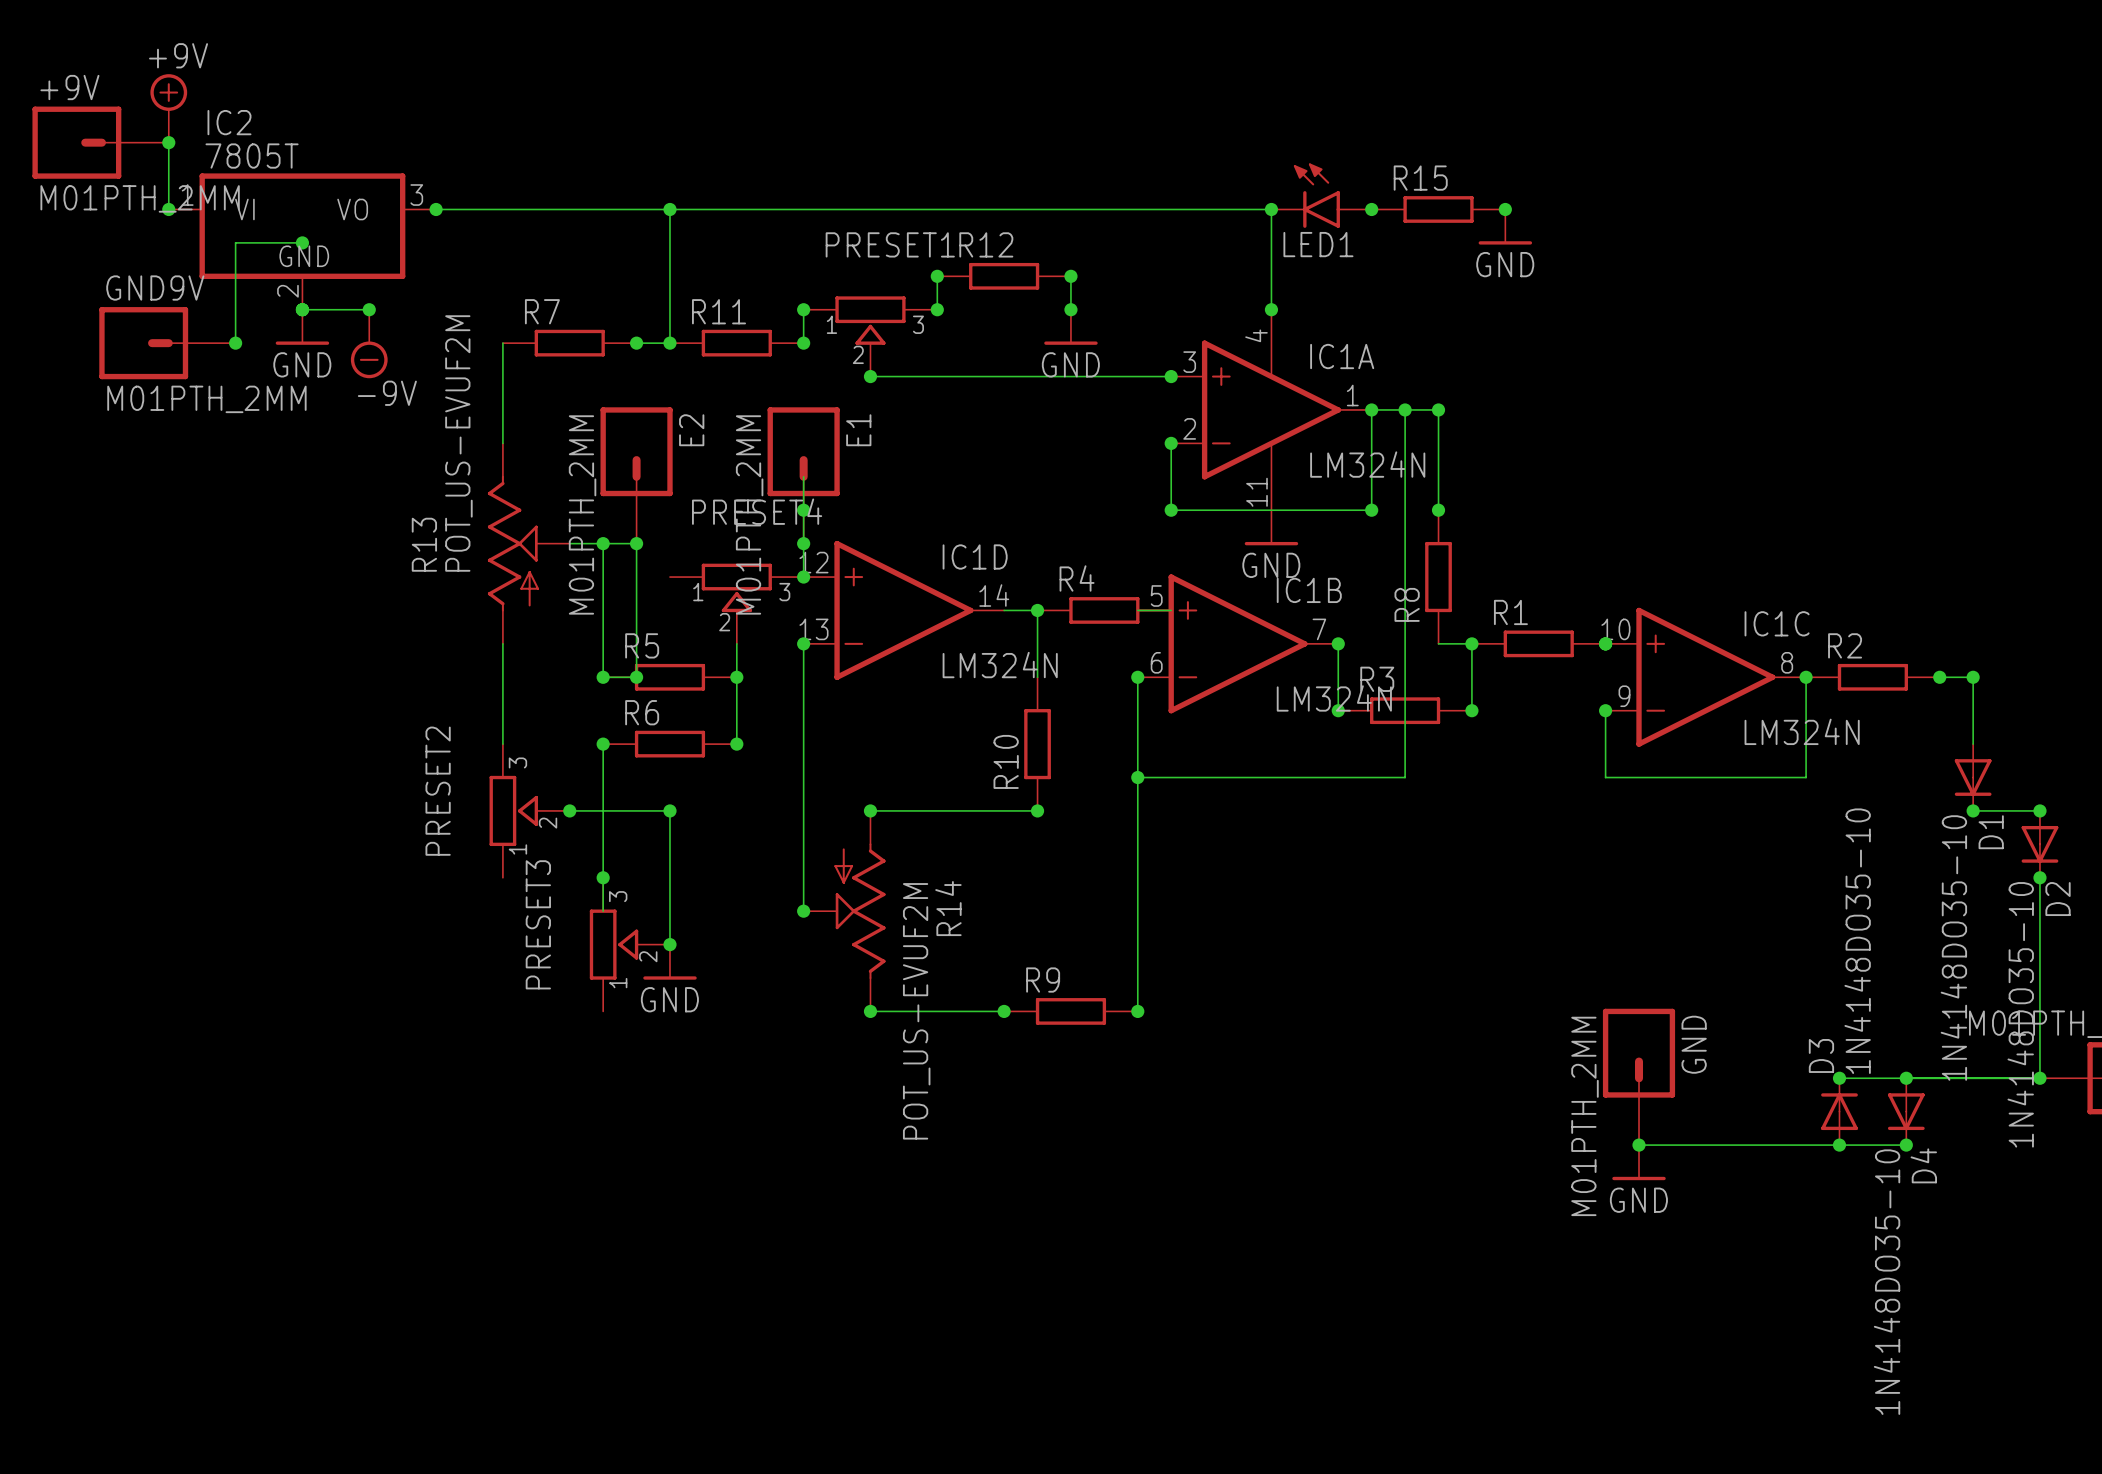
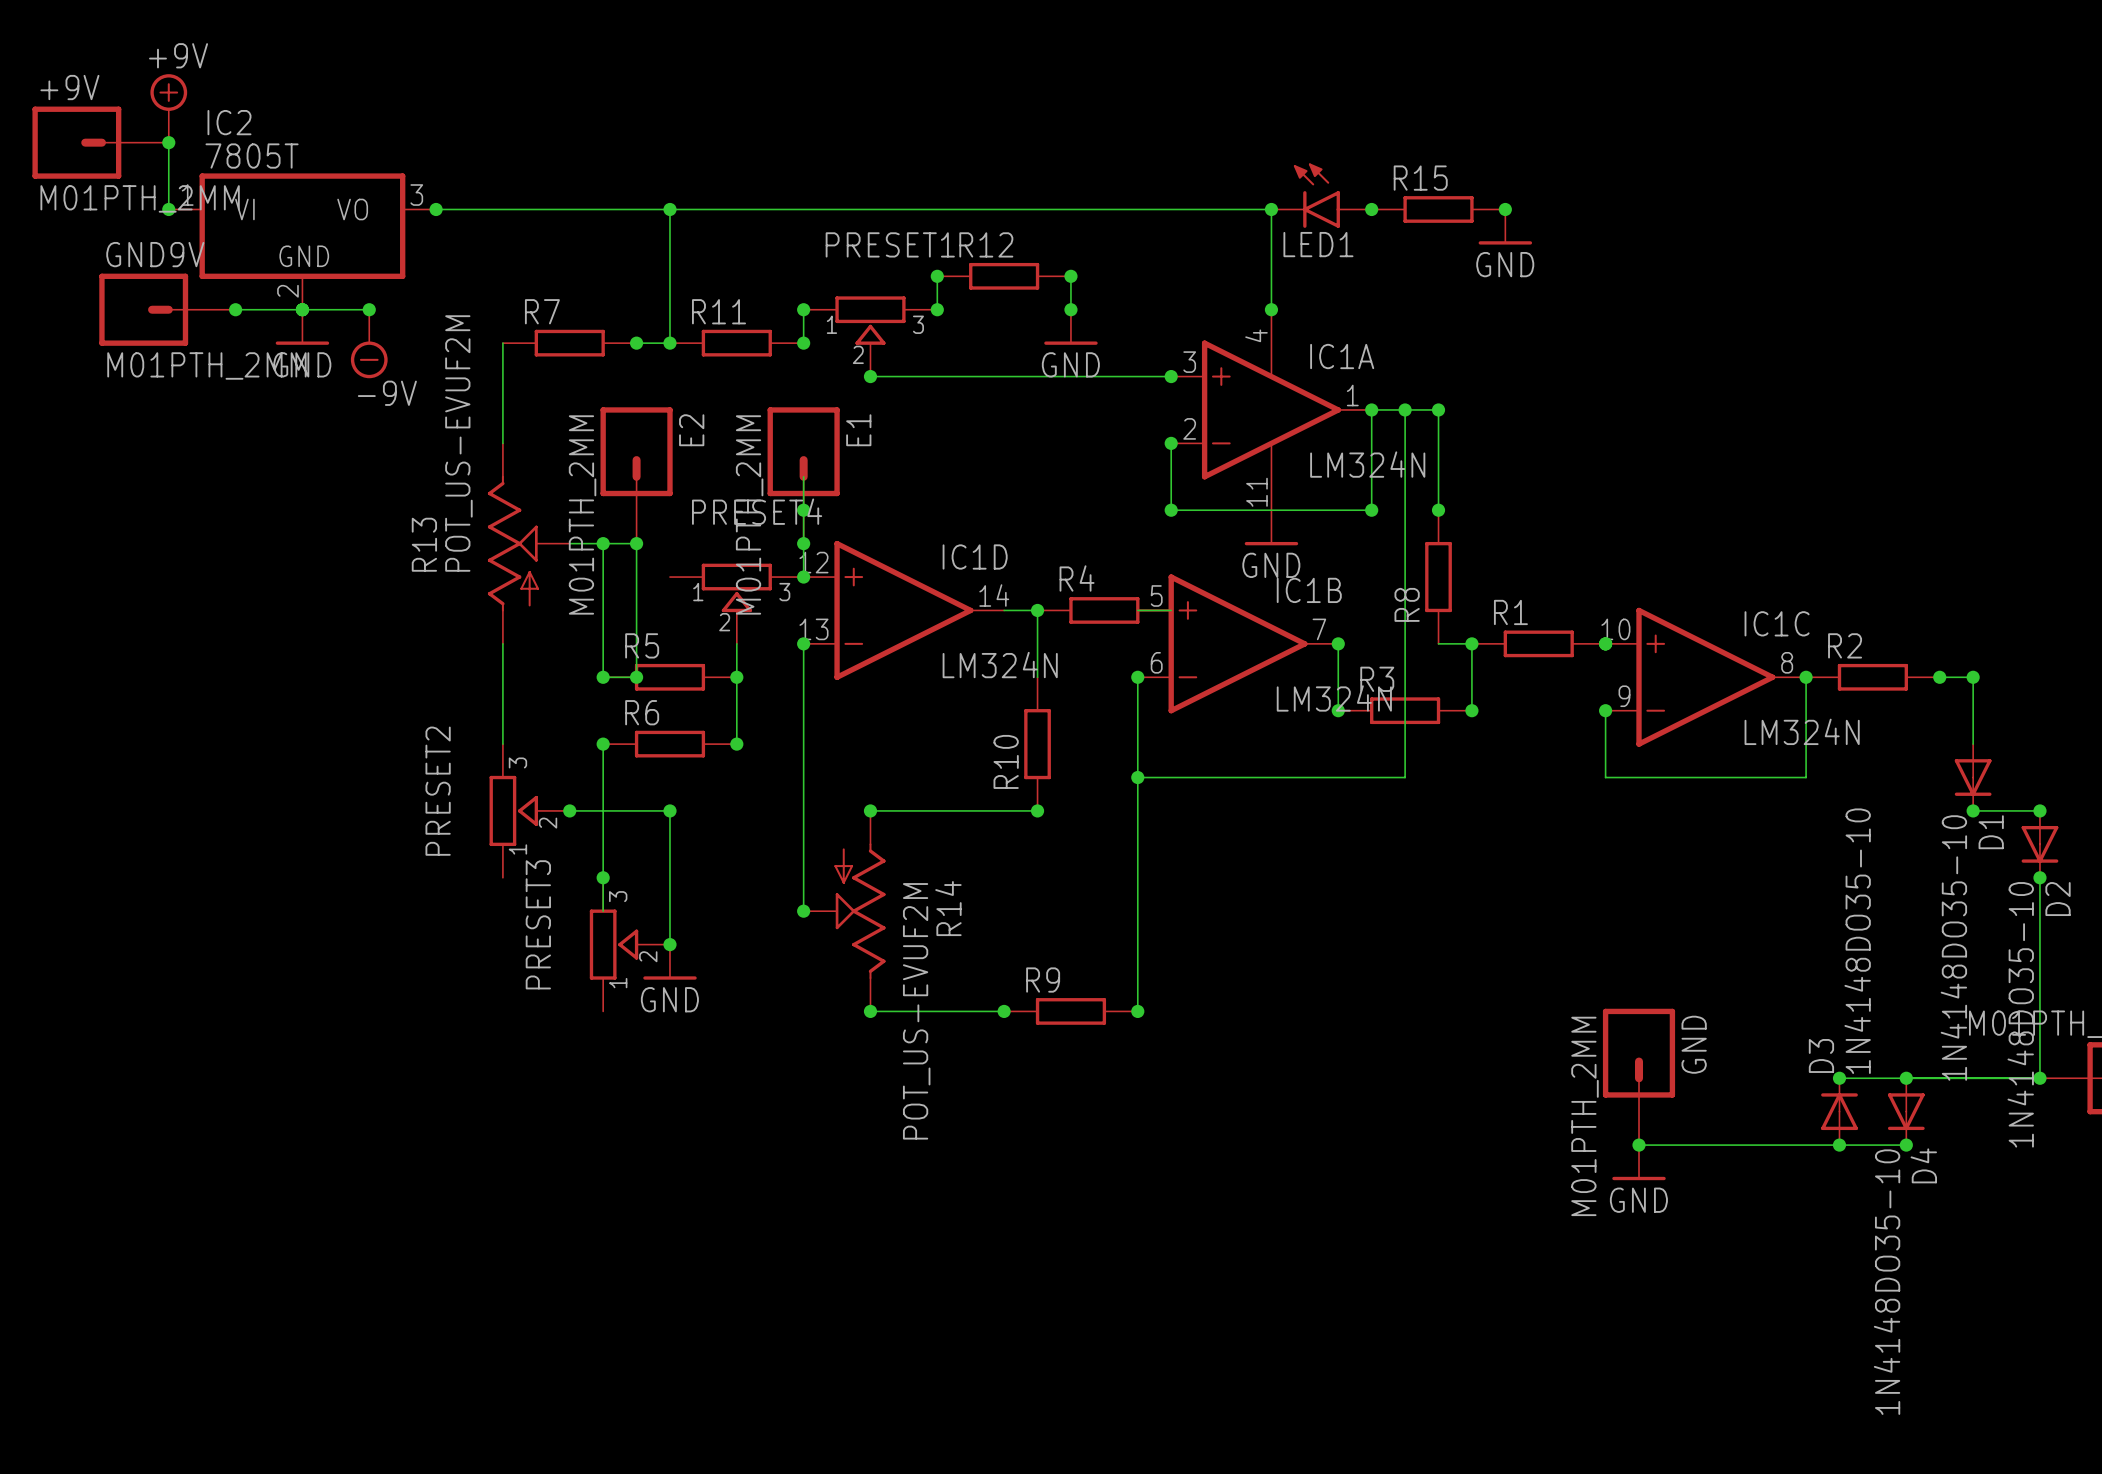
wire: (302, 242) (235, 242) (235, 343) -> none
junction: (302, 242) -> none
wire: none -> (235, 309) (302, 309)
GND9V position: (167, 343) -> (167, 309)
junction position: (235, 343) -> (235, 309)

